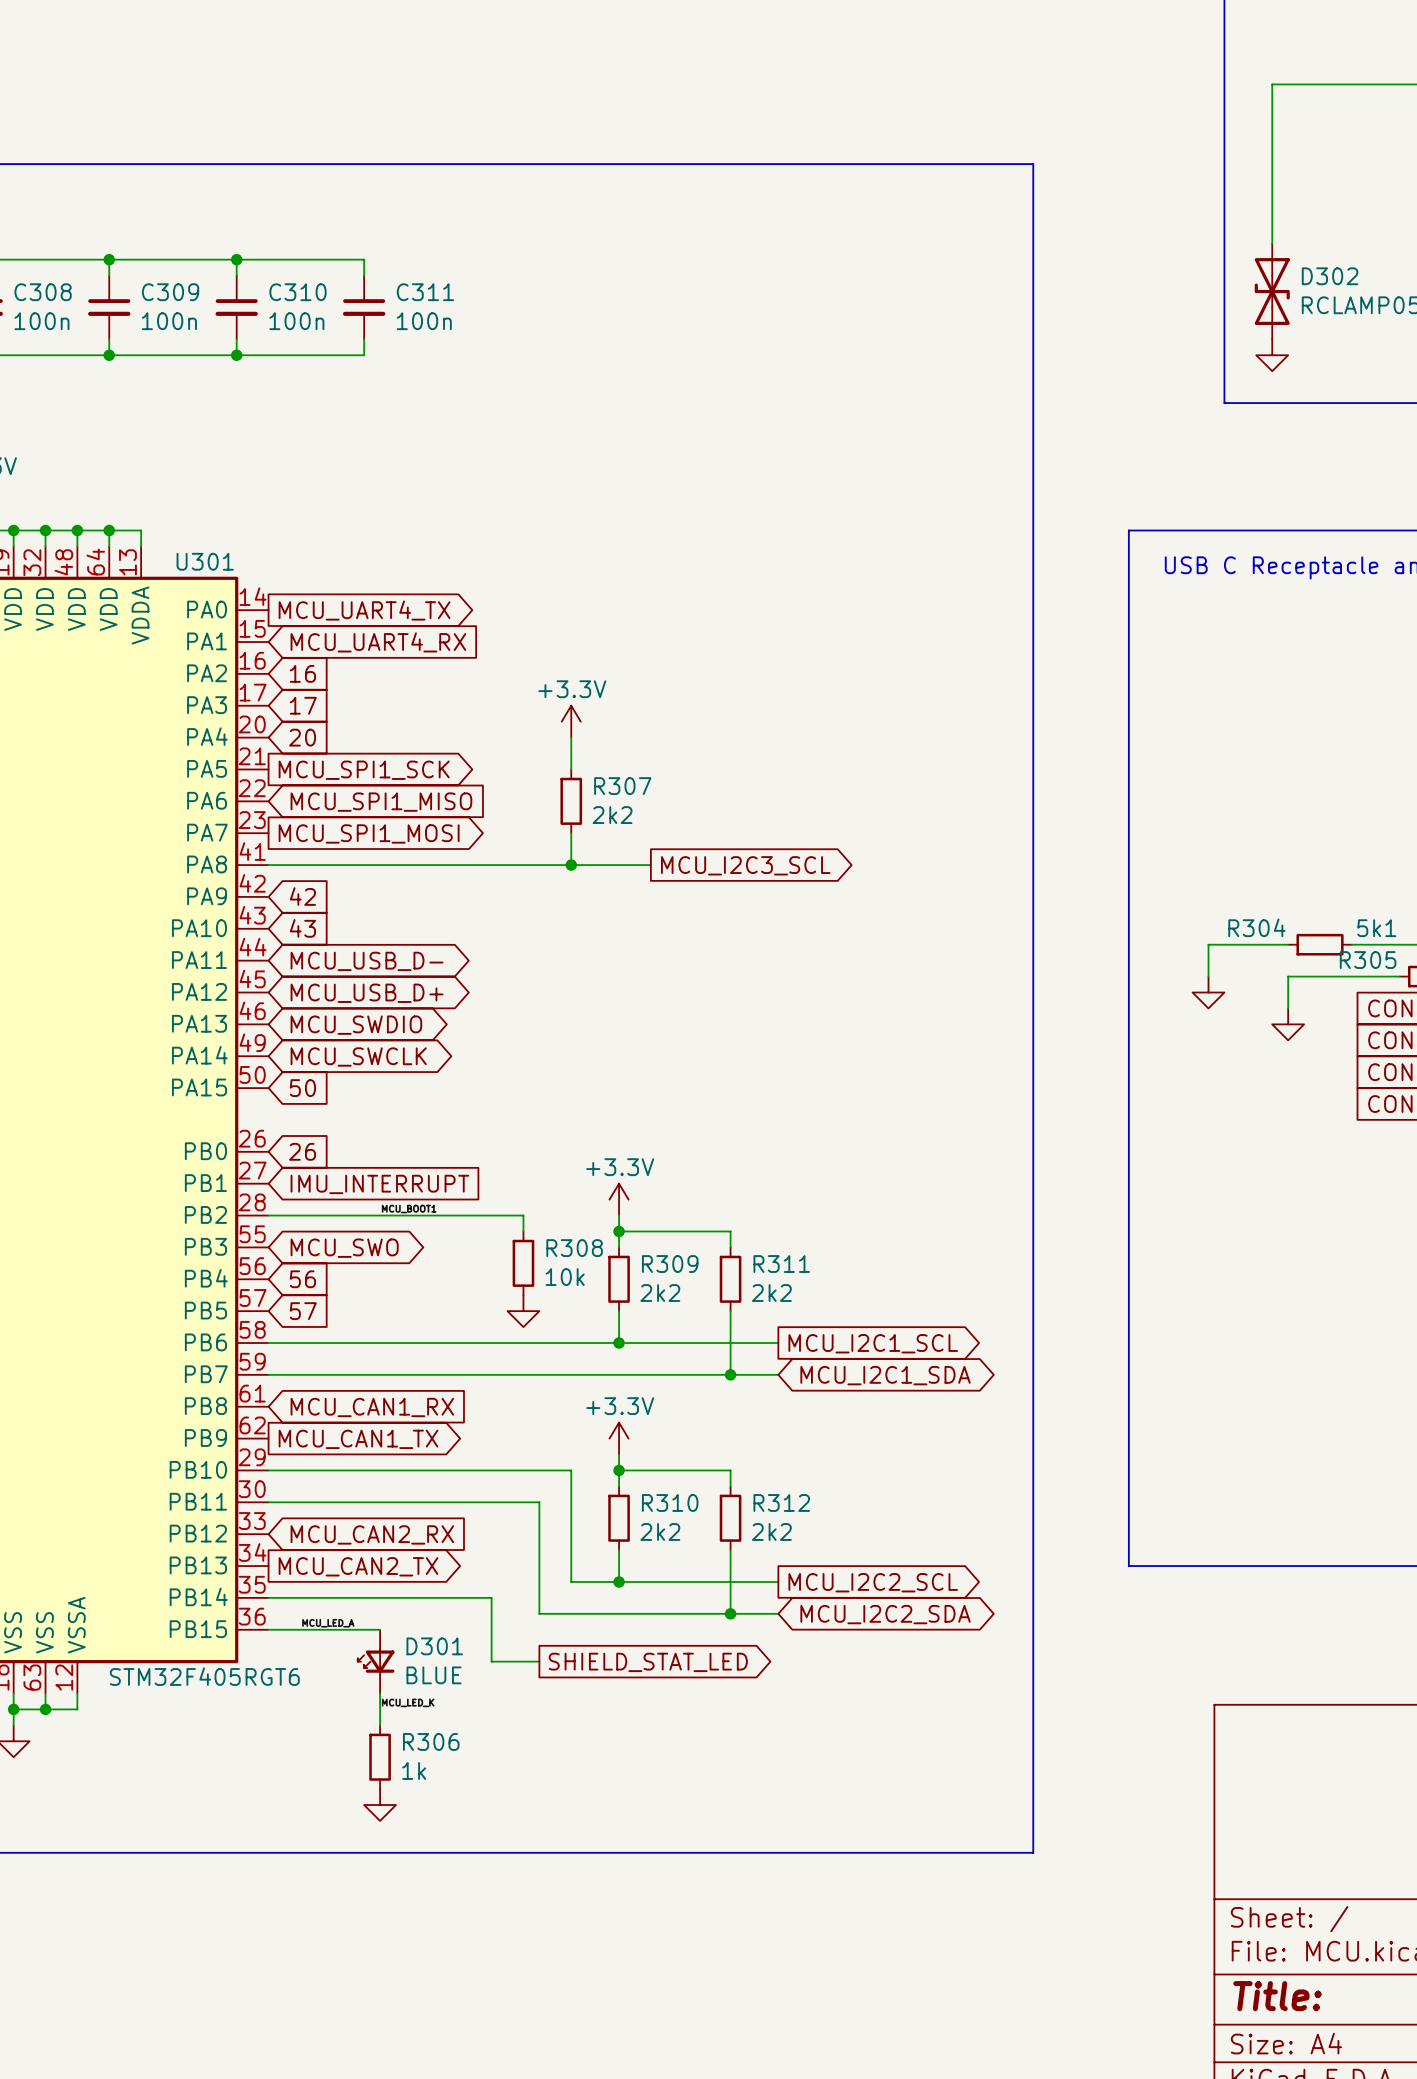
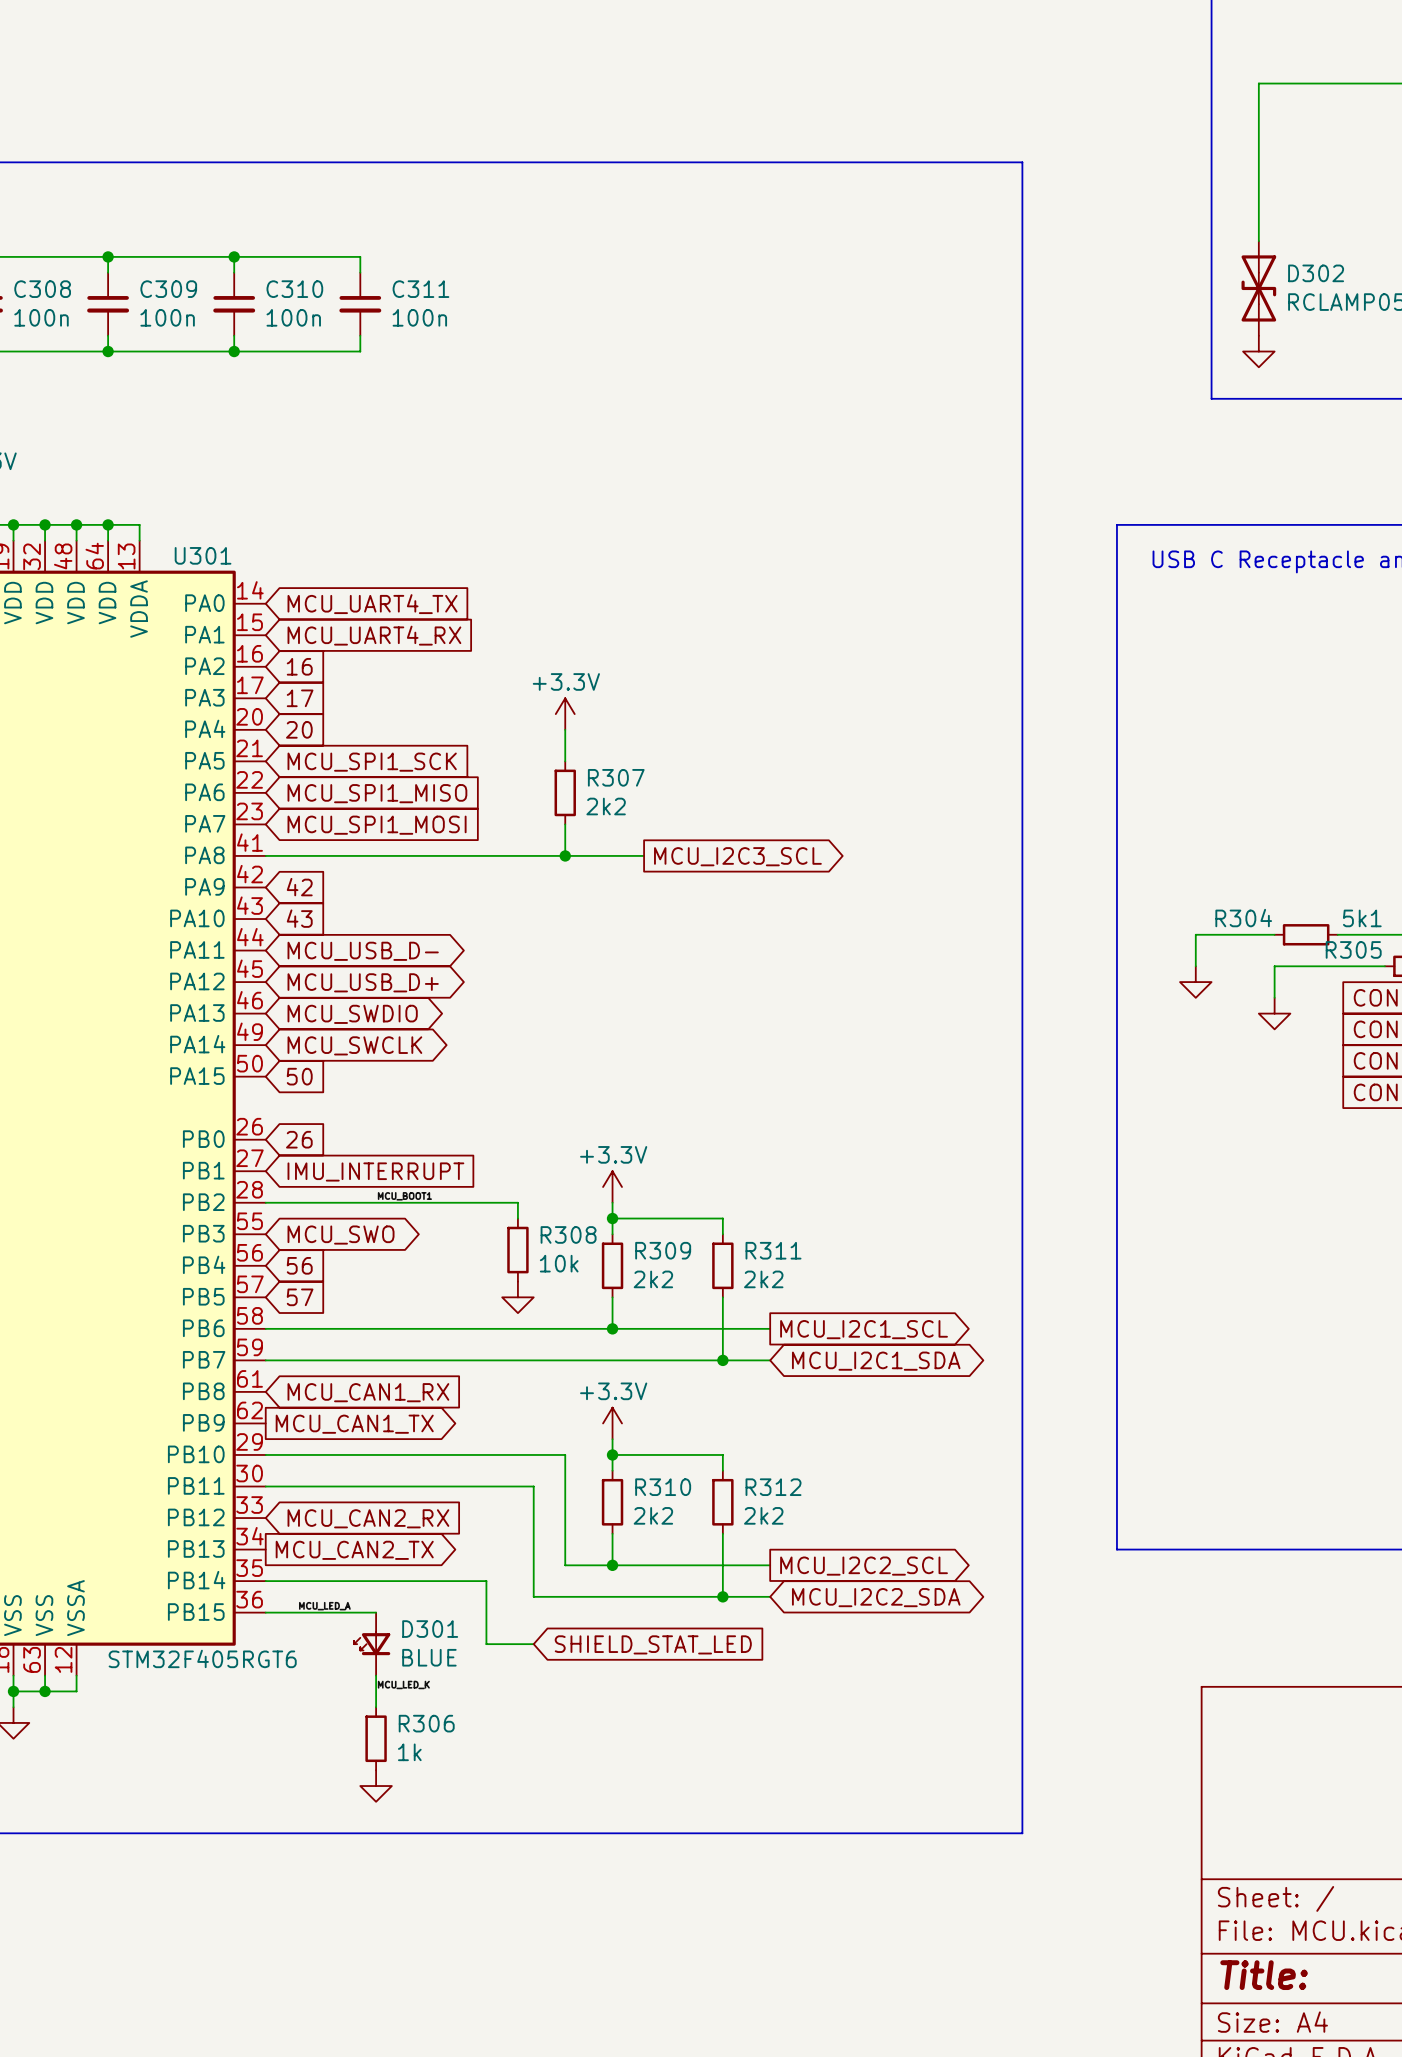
global label shape: output (364, 610) -> input (372, 604)
global label shape: output (364, 770) -> input (372, 762)
global label shape: output (369, 833) -> input (377, 825)
global label shape: output (648, 1662) -> input (653, 1644)

